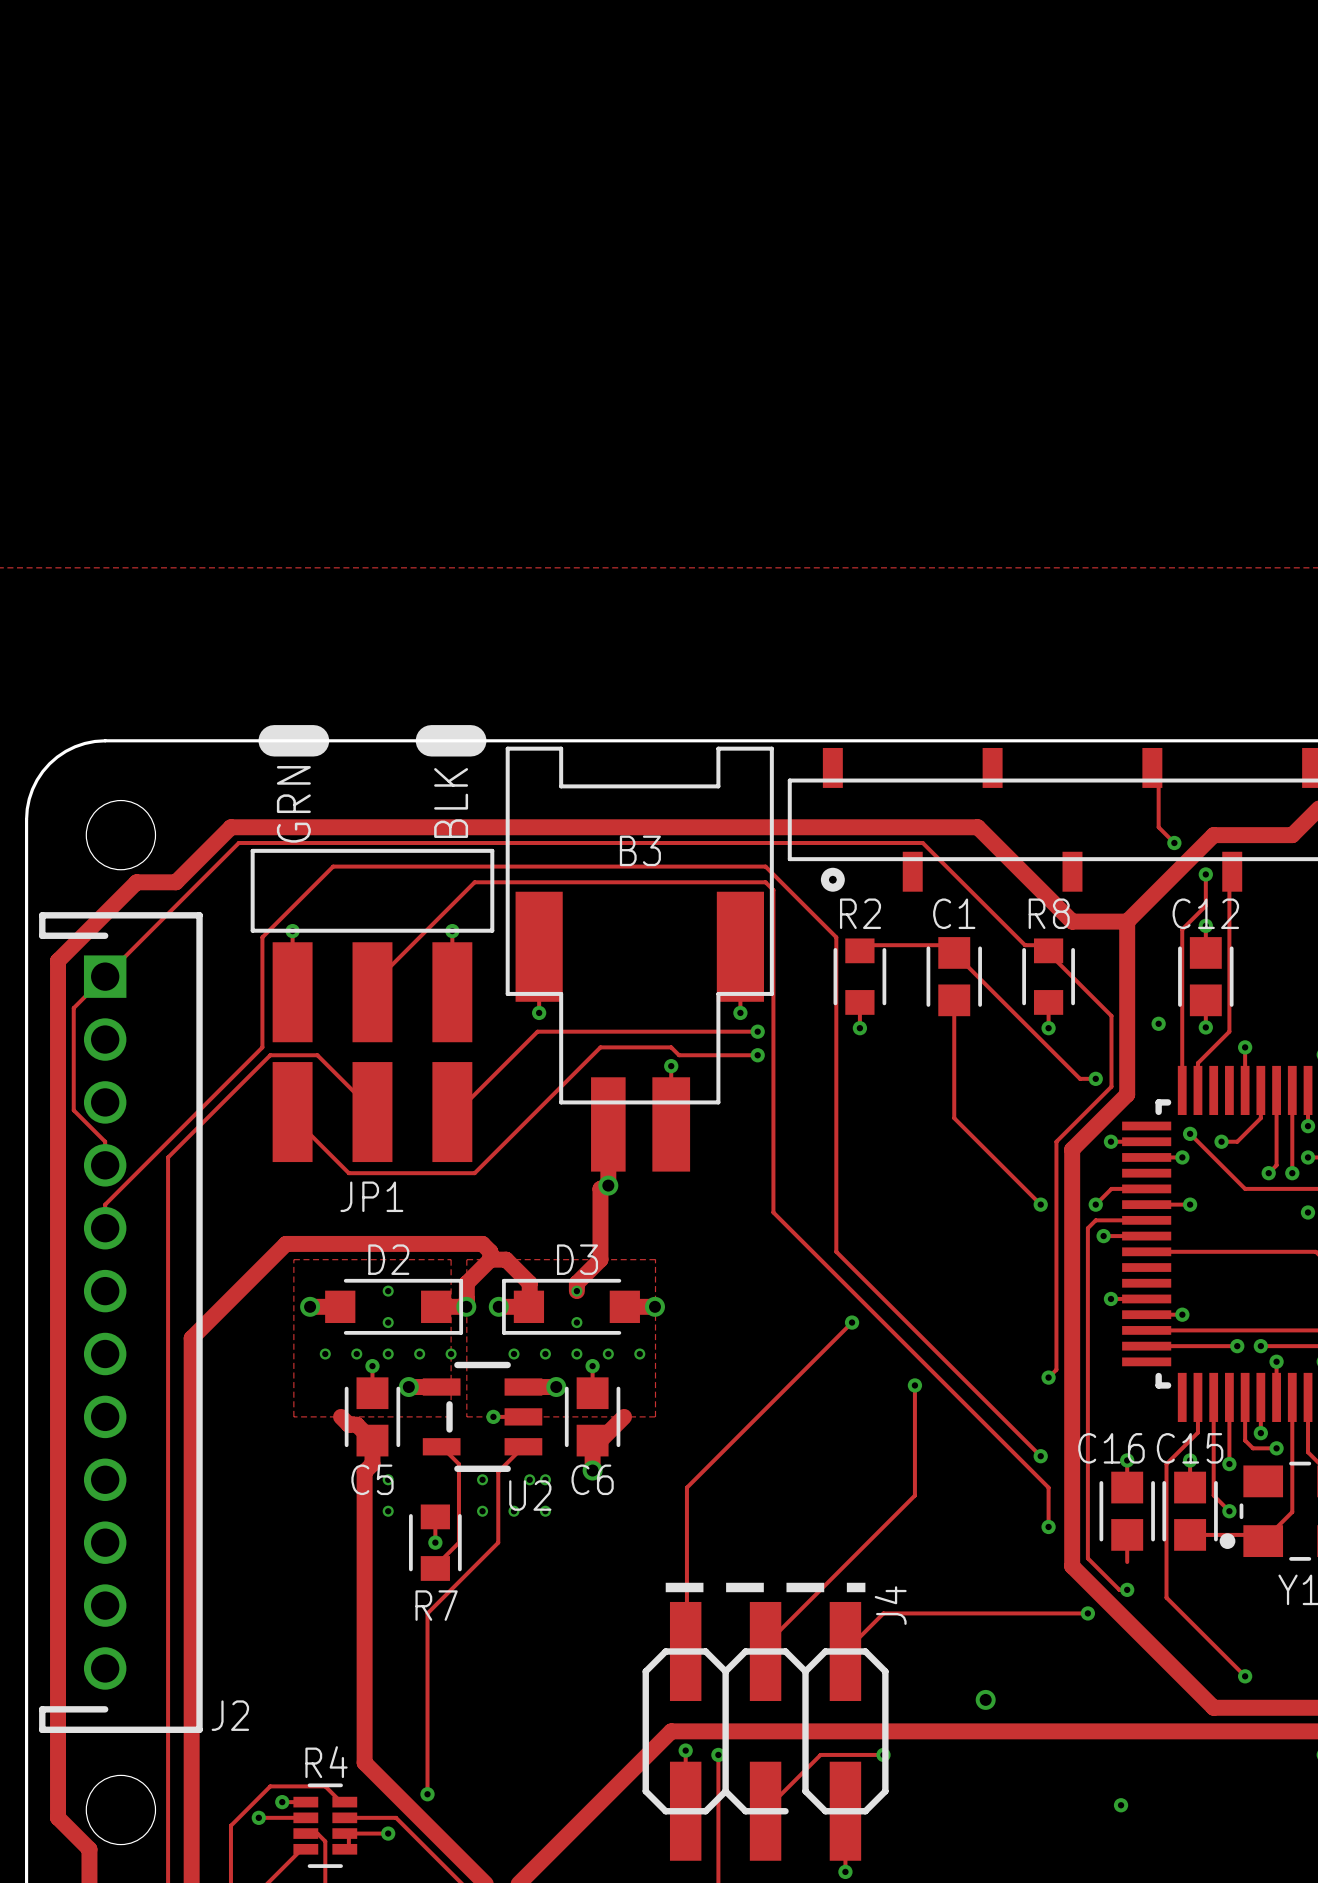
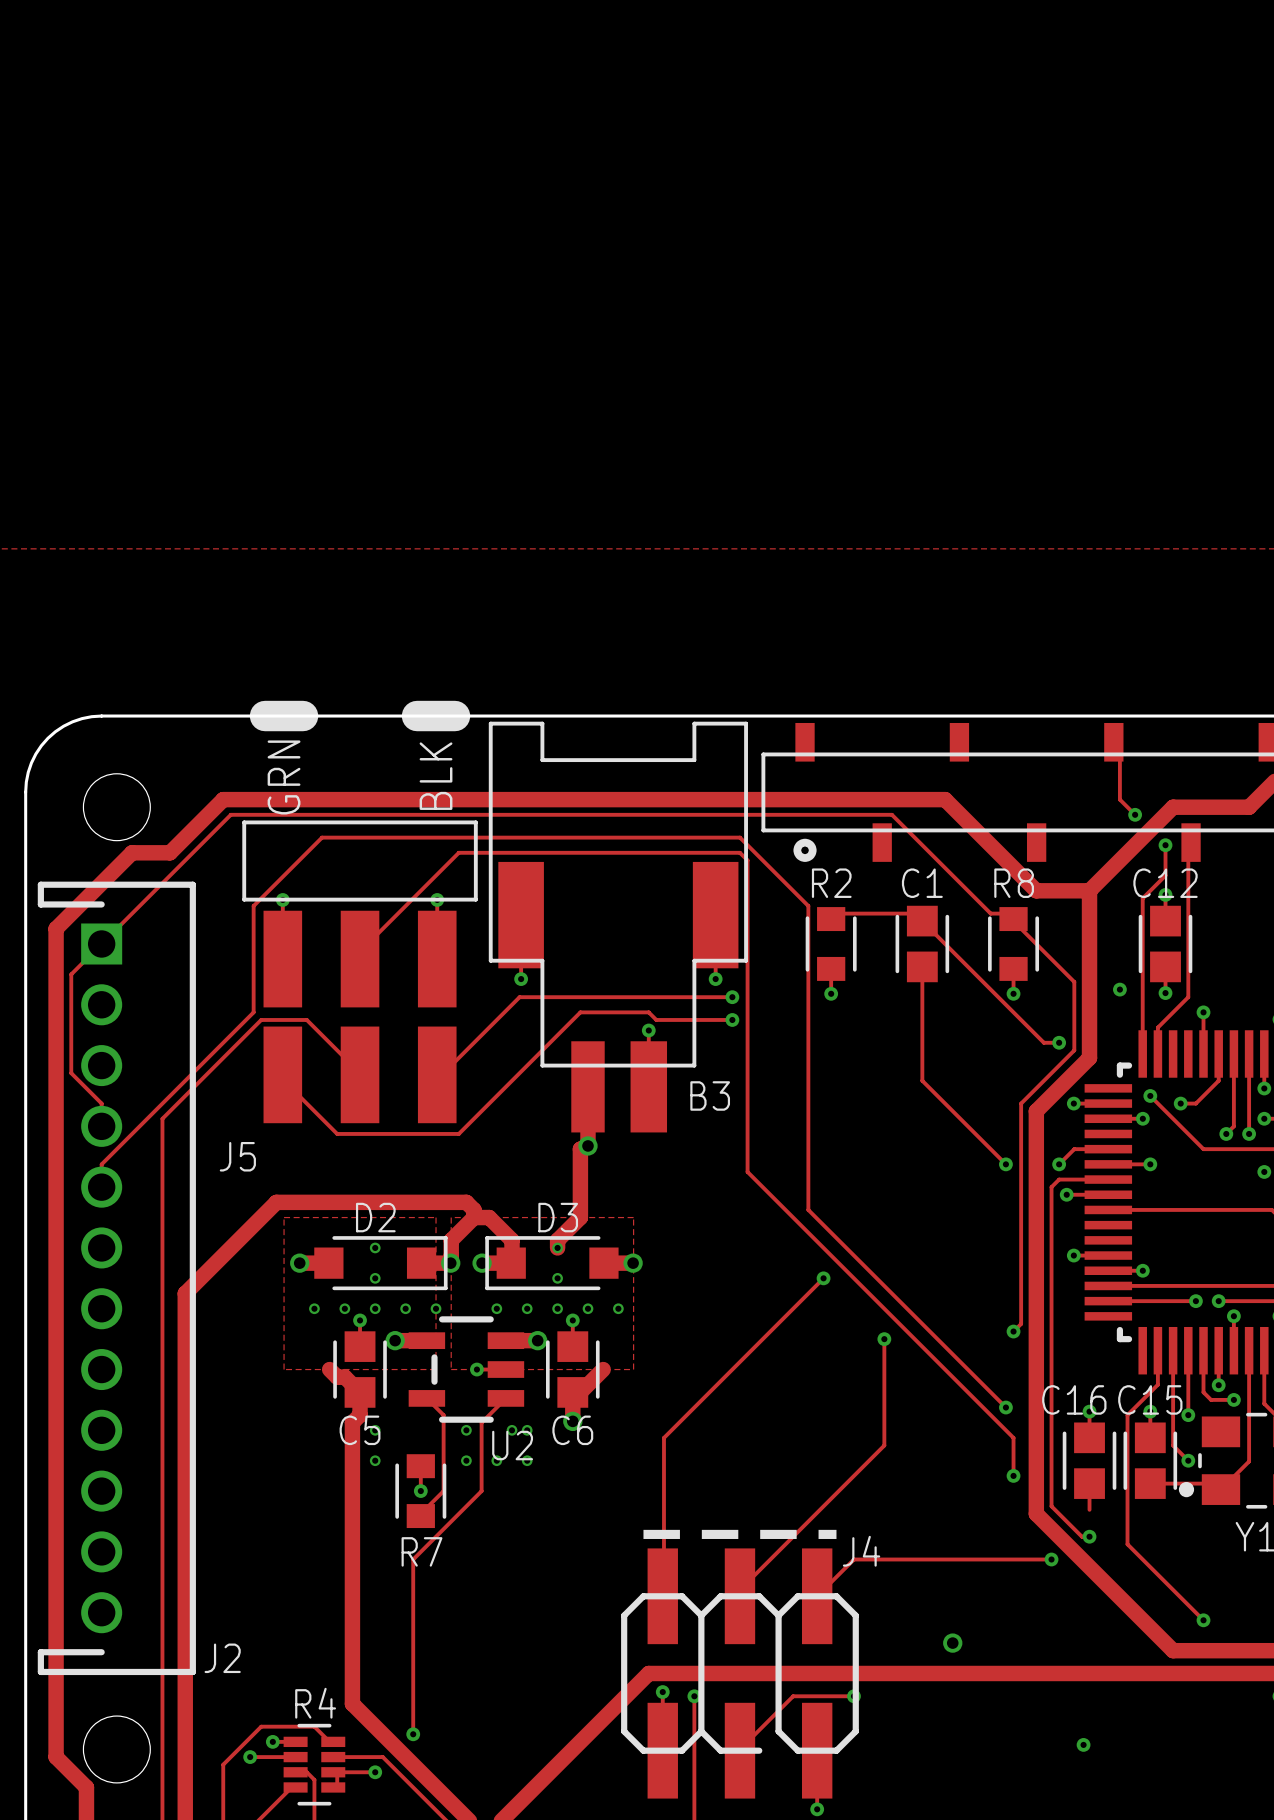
B3 name position: B3 (640, 850) -> B3 (710, 1095)
JP1 name: JP1 (371, 1196) -> J5 (237, 1156)
J4 name rotation: 0° (890, 1605) -> 90° clockwise (861, 1551)

